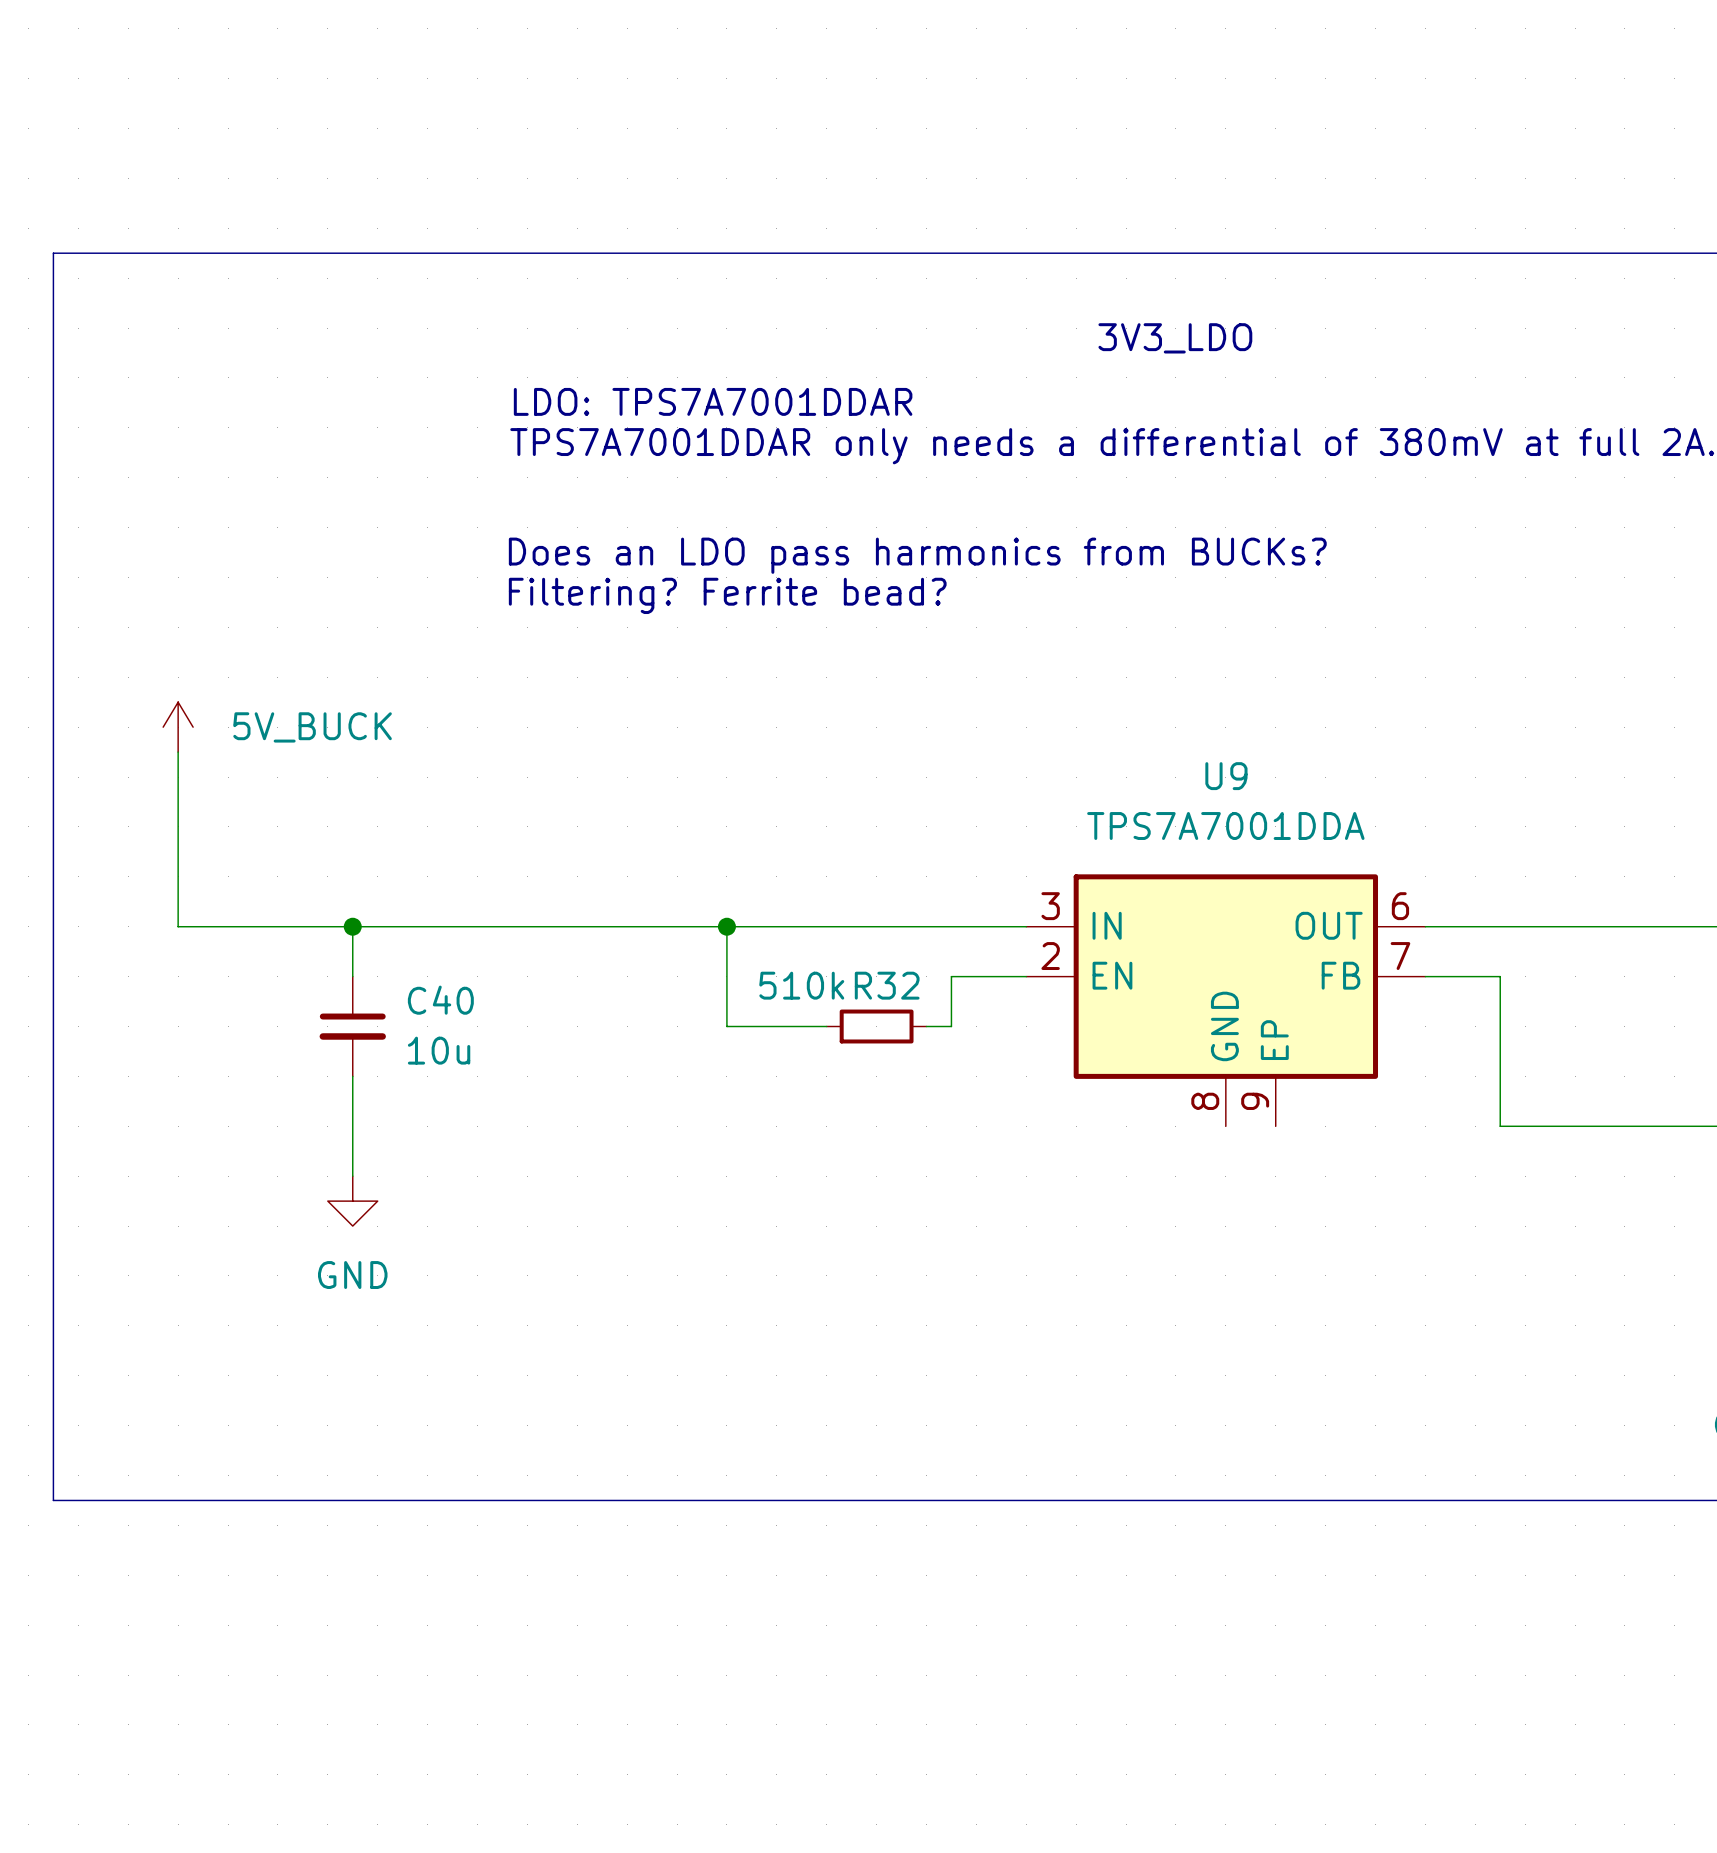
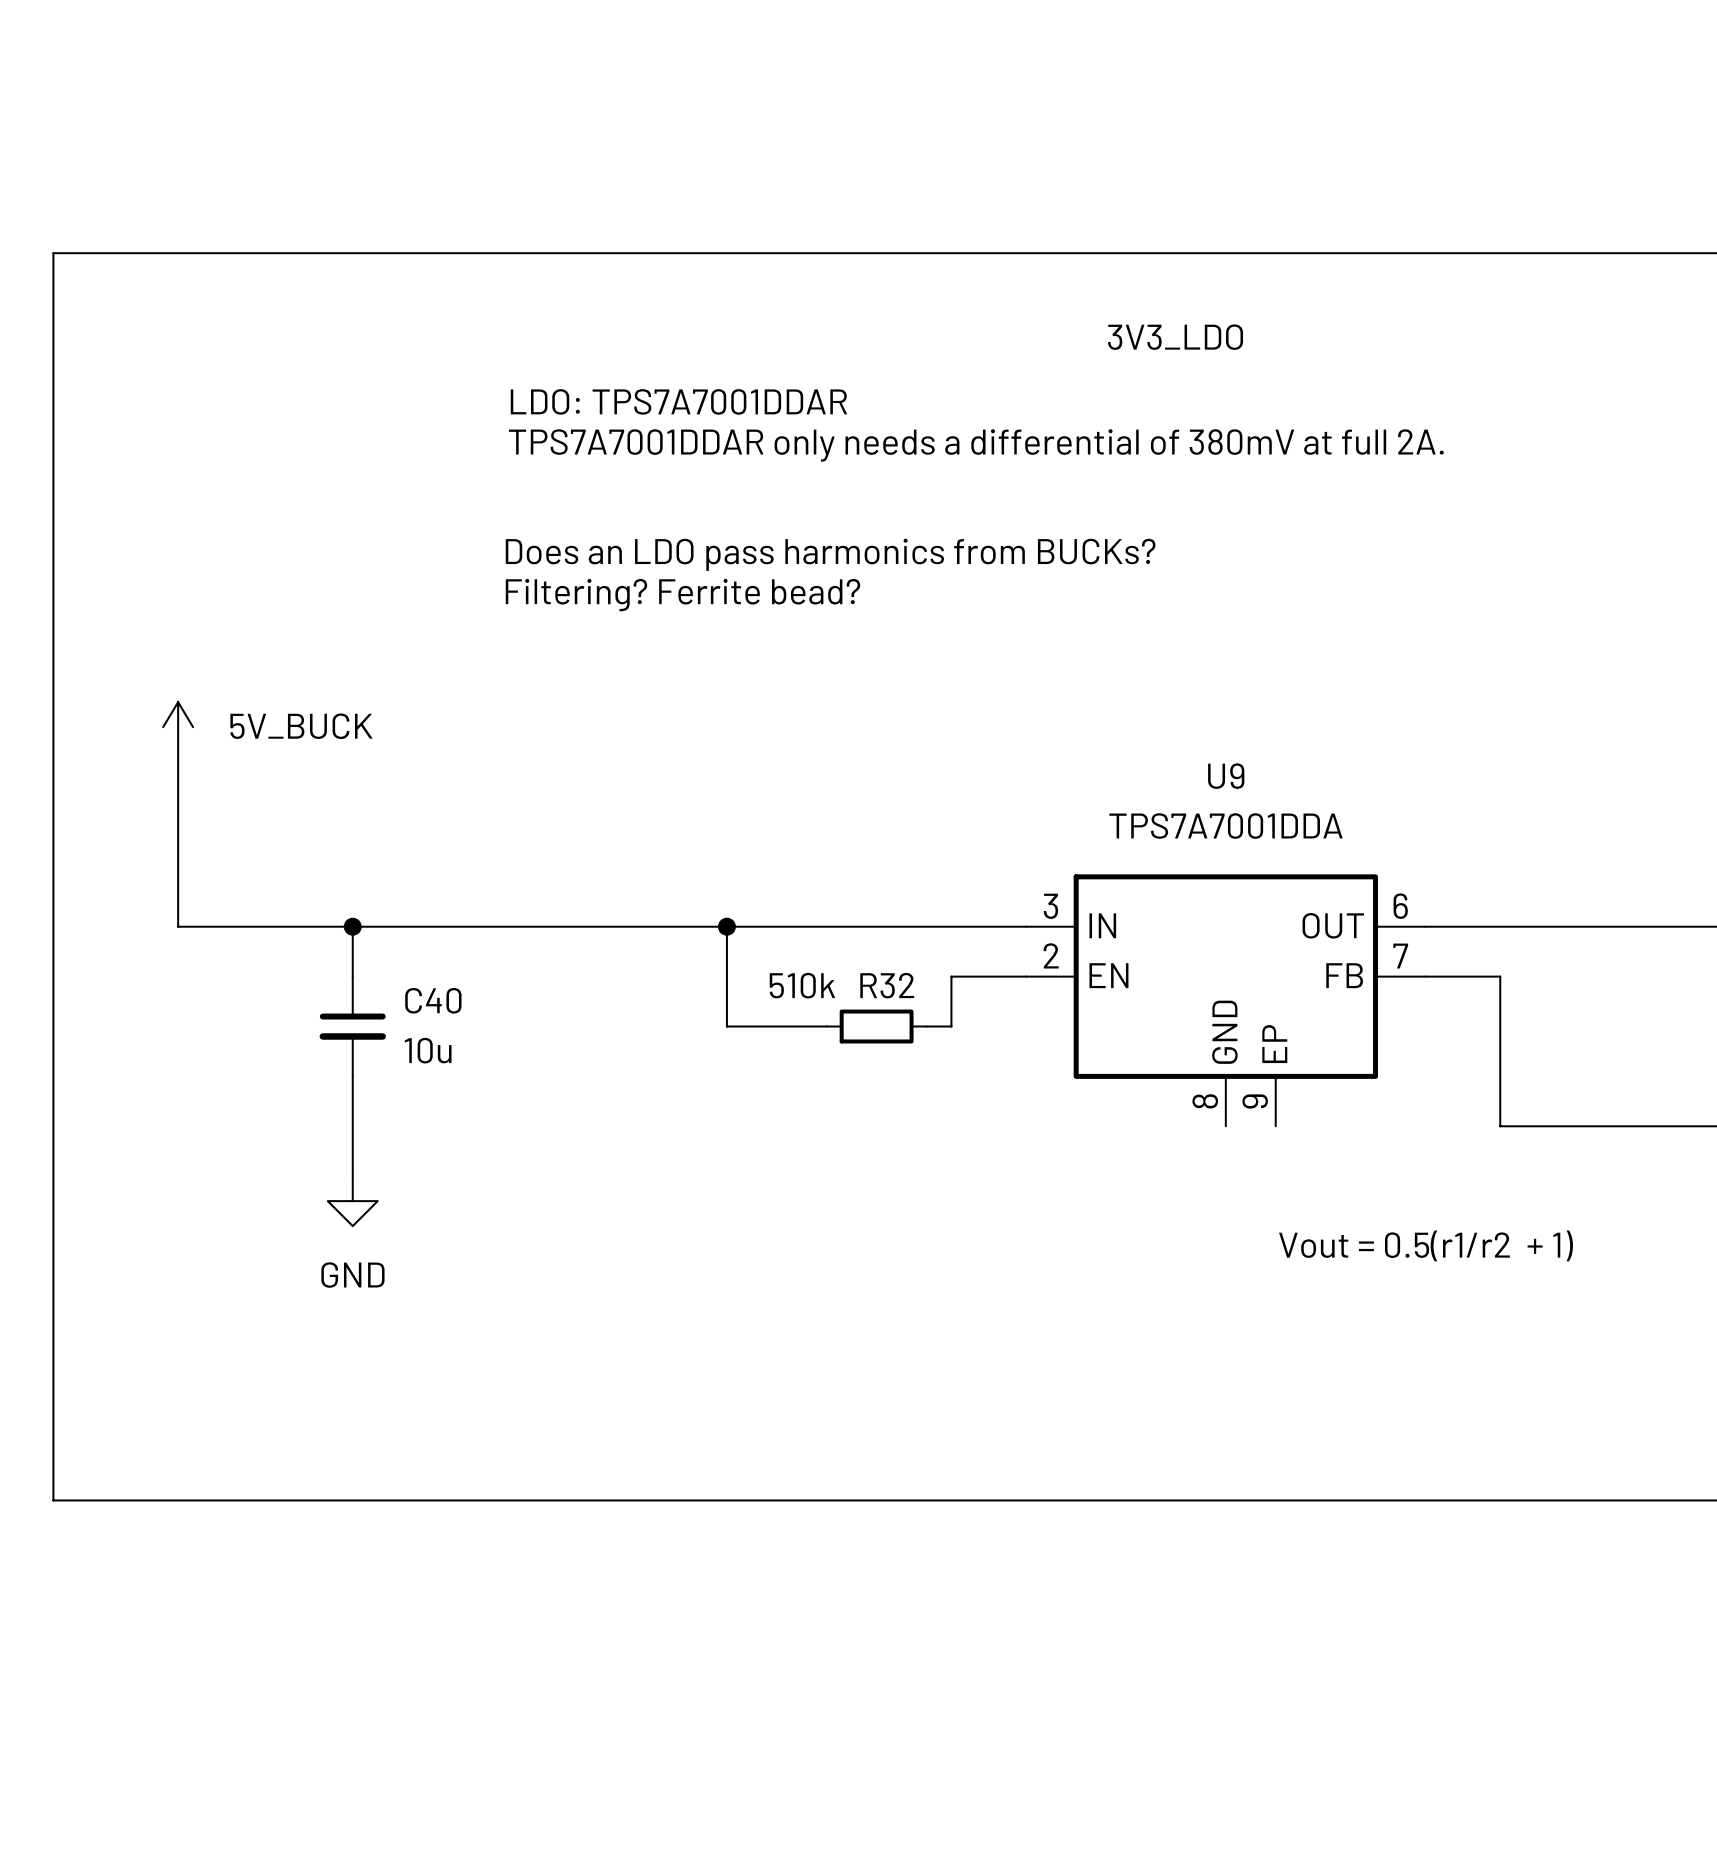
text: none -> Vout = 0.5(r1/r2 + 1) (1426, 1245)

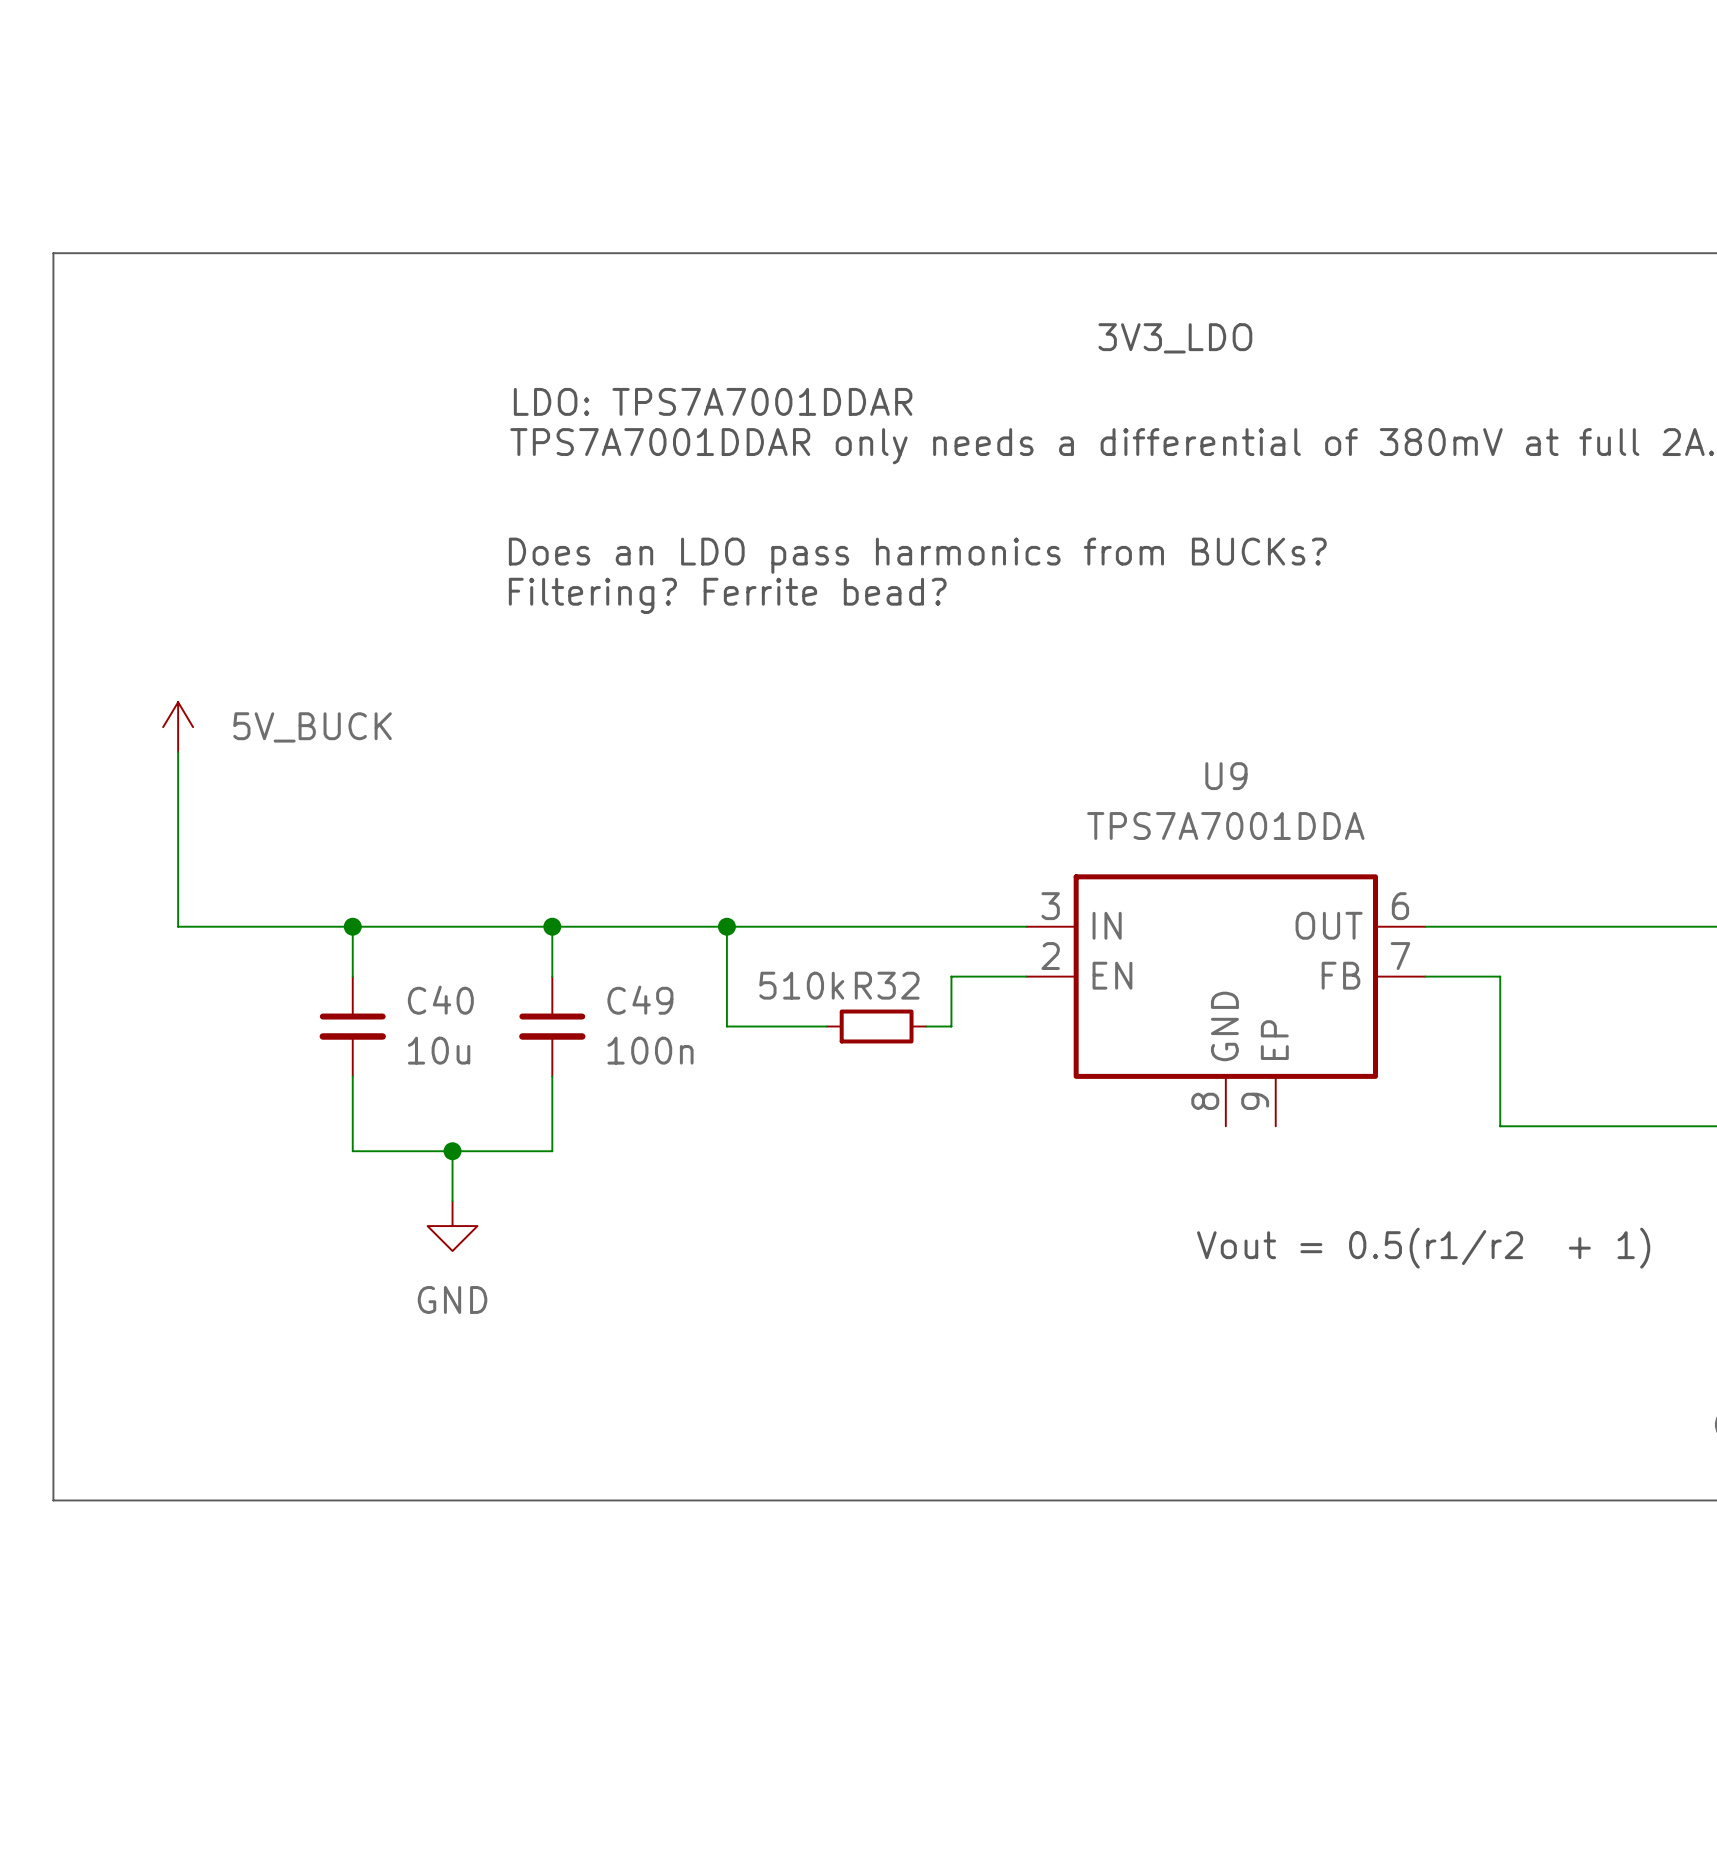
wire: none -> (552, 926) (552, 976)
junction: none -> (552, 926)
C49: none -> 100n (552, 1026)
wire: (352, 1151) (352, 1176) -> (352, 1151) (552, 1151) (552, 1076)
wire: none -> (452, 1151) (452, 1201)
junction: none -> (452, 1151)
power symbol position: GND (352, 1201) -> GND (452, 1226)

